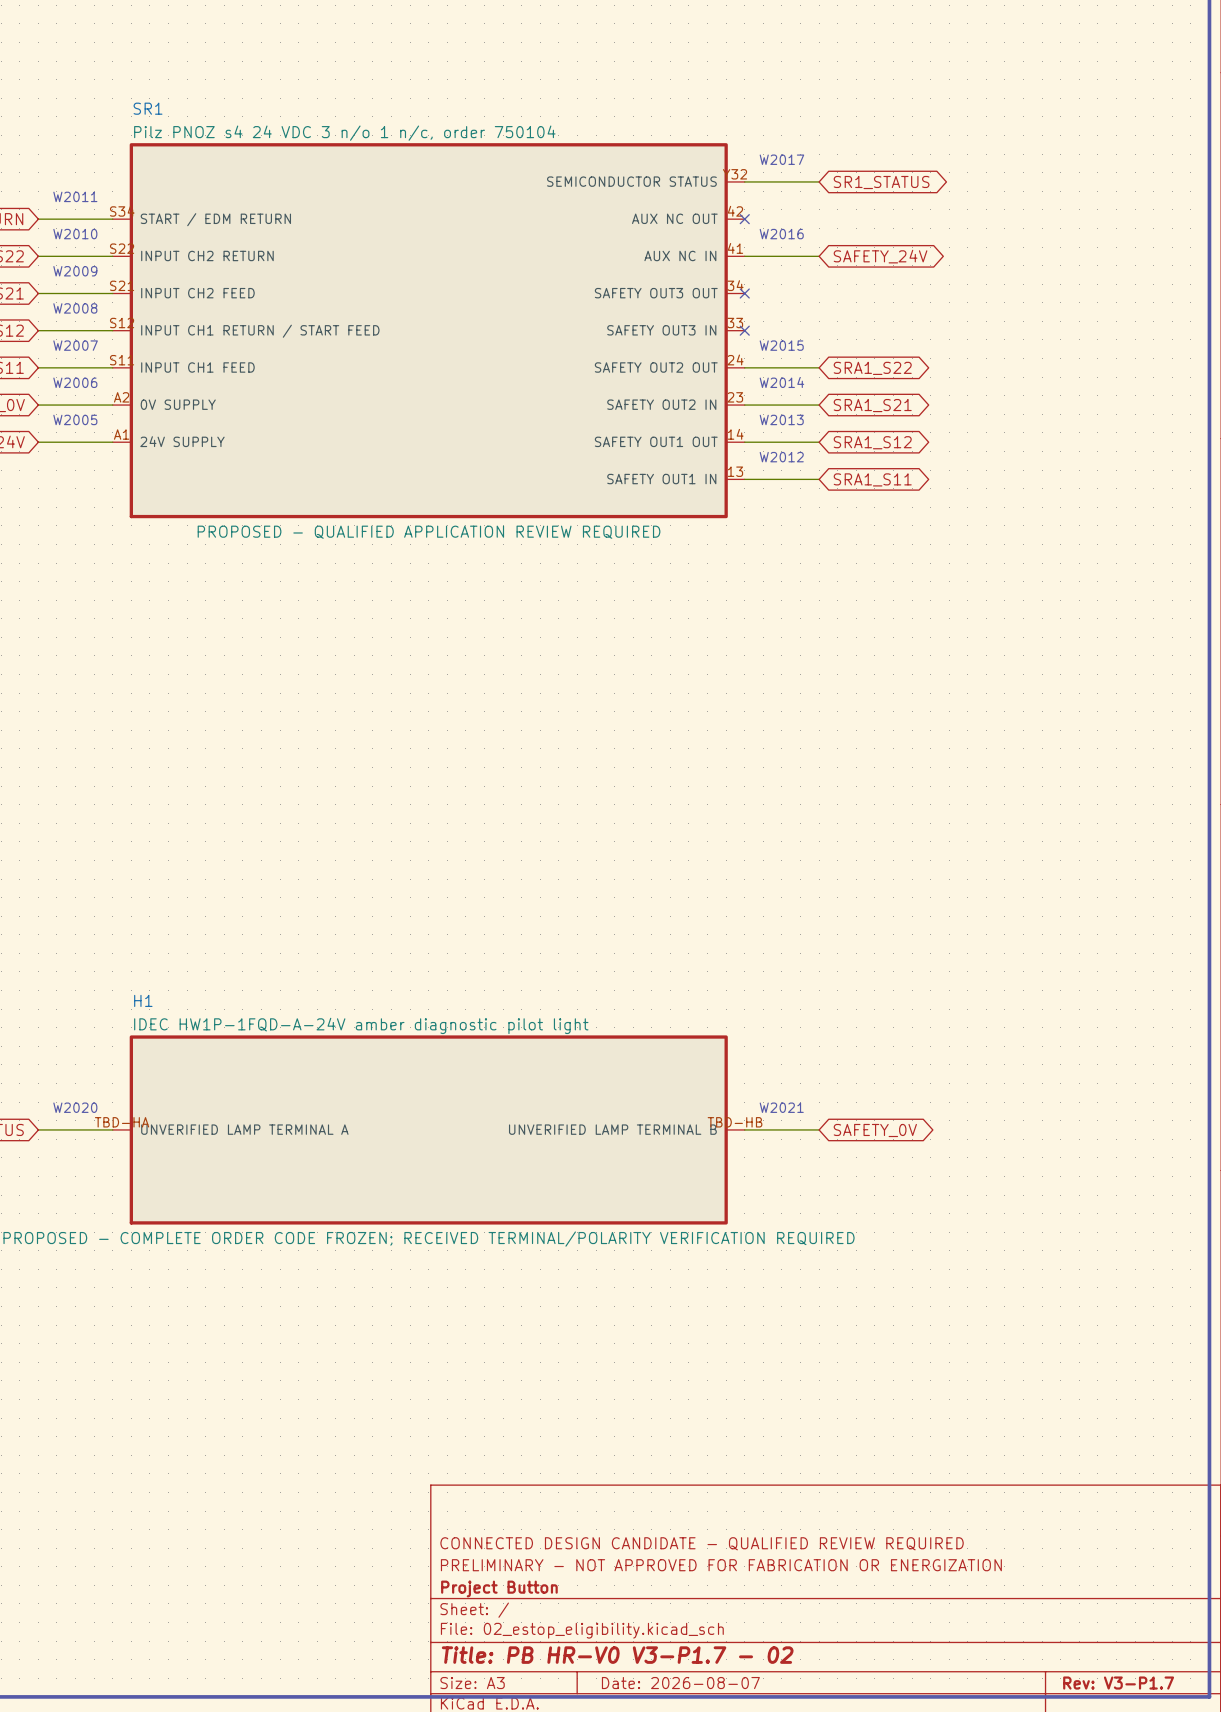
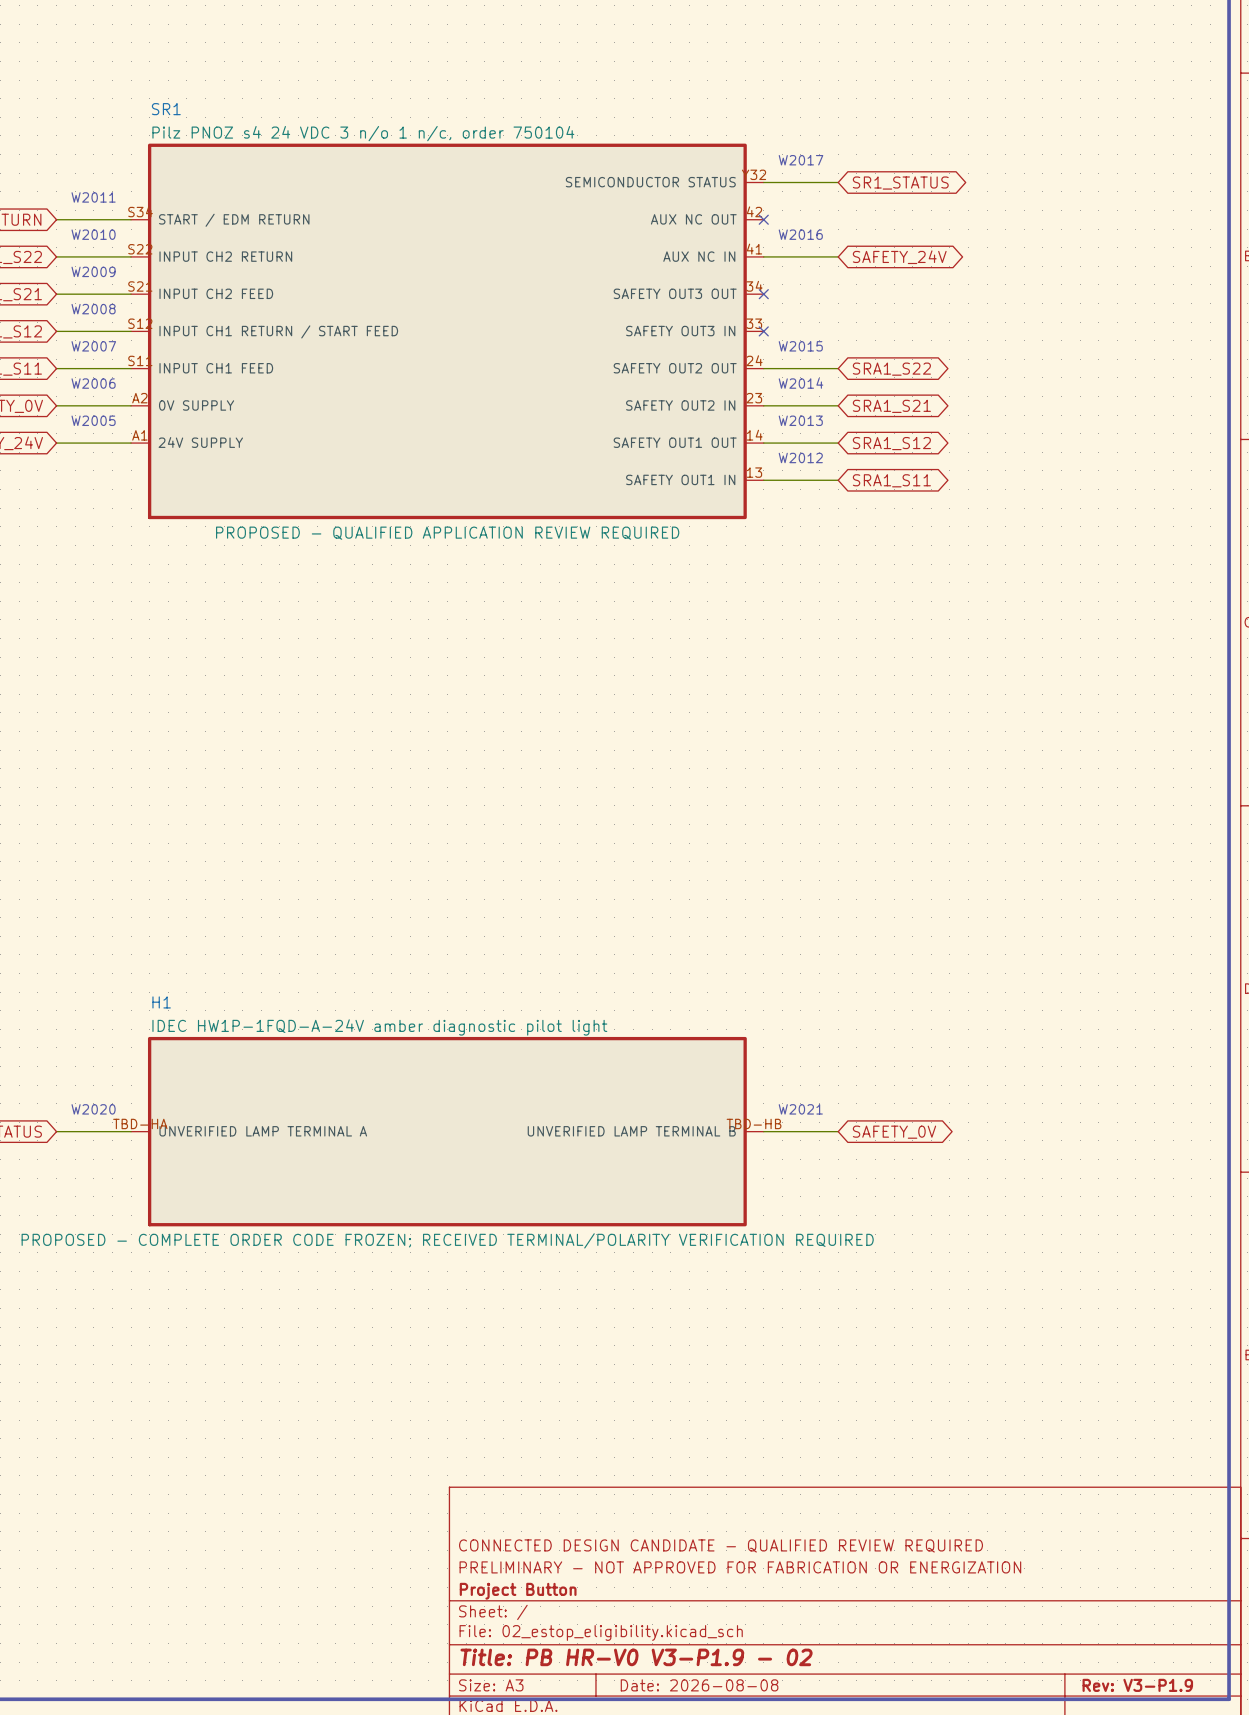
title block: Title: PB HR-V0 V3-P1.7 - 02 (617, 1655) -> Title: PB HR-V0 V3-P1.9 - 02 (636, 1657)
title block: Date: 2026-08-07 (680, 1683) -> Date: 2026-08-08 (699, 1685)
title block: Rev: V3-P1.7 (1118, 1683) -> Rev: V3-P1.9 (1137, 1685)

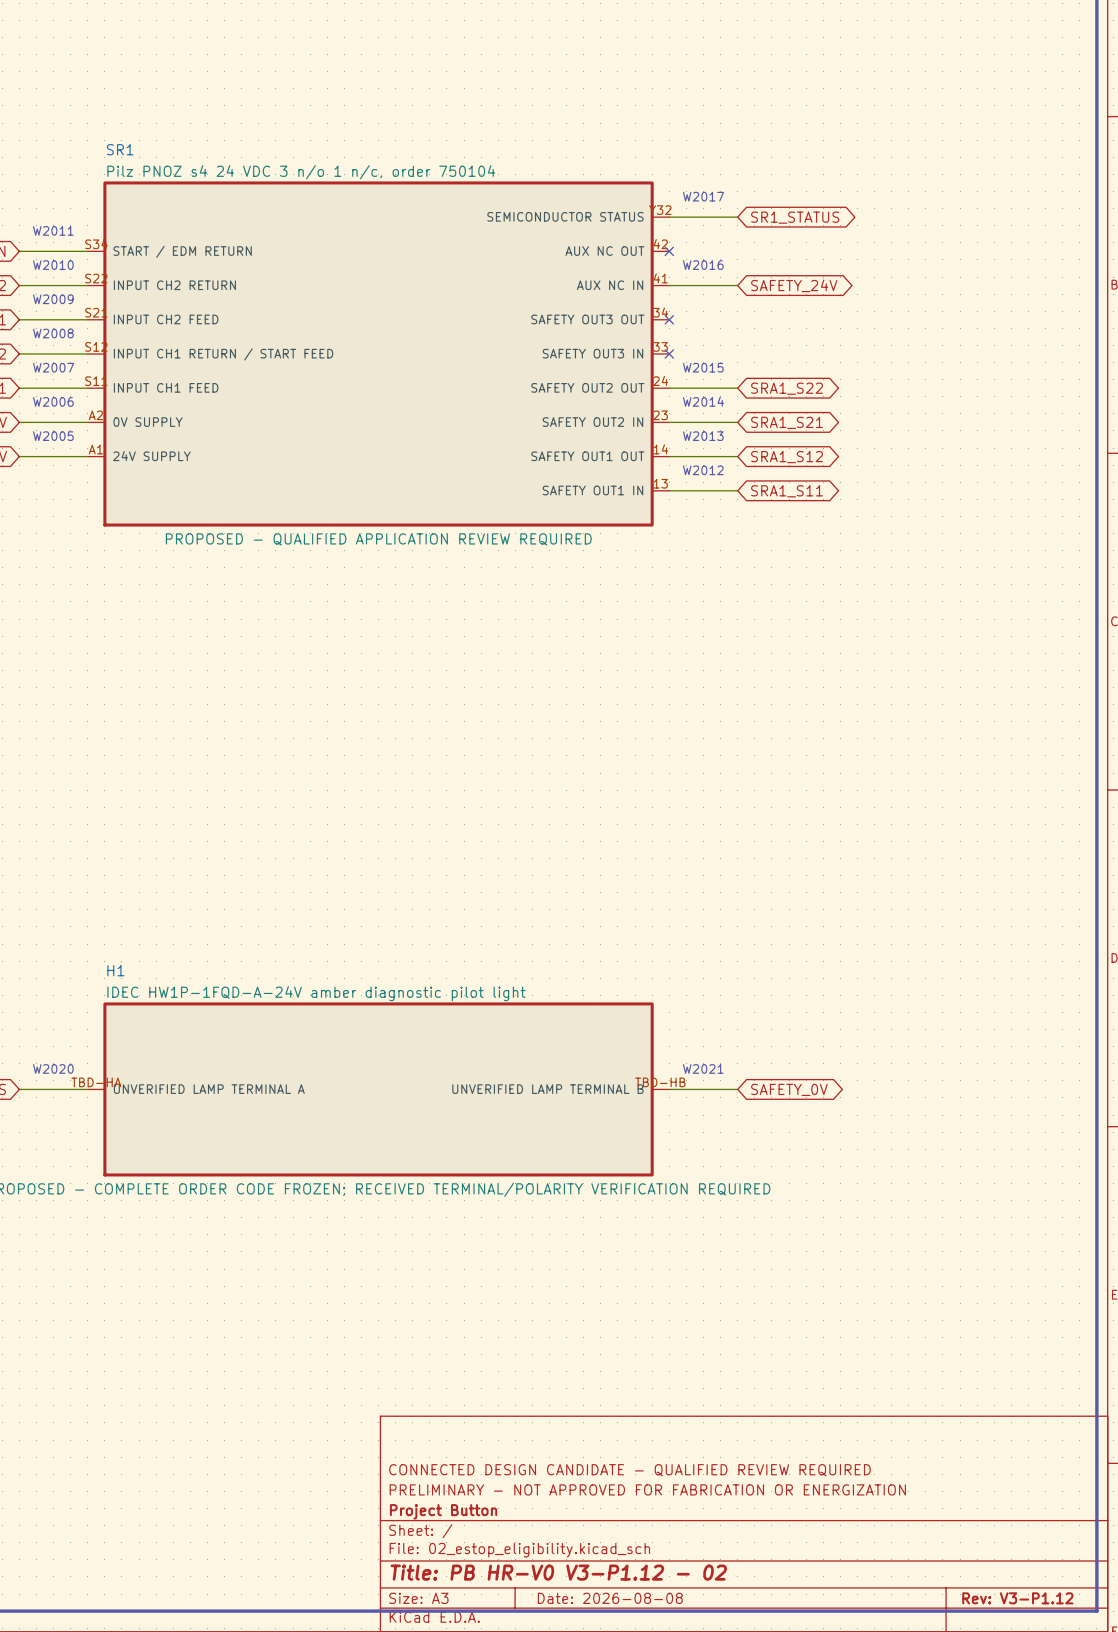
title block: Title: PB HR-V0 V3-P1.9 - 02 (636, 1657) -> Title: PB HR-V0 V3-P1.12 - 02 (558, 1572)
title block: Rev: V3-P1.9 (1137, 1685) -> Rev: V3-P1.12 (1017, 1598)

